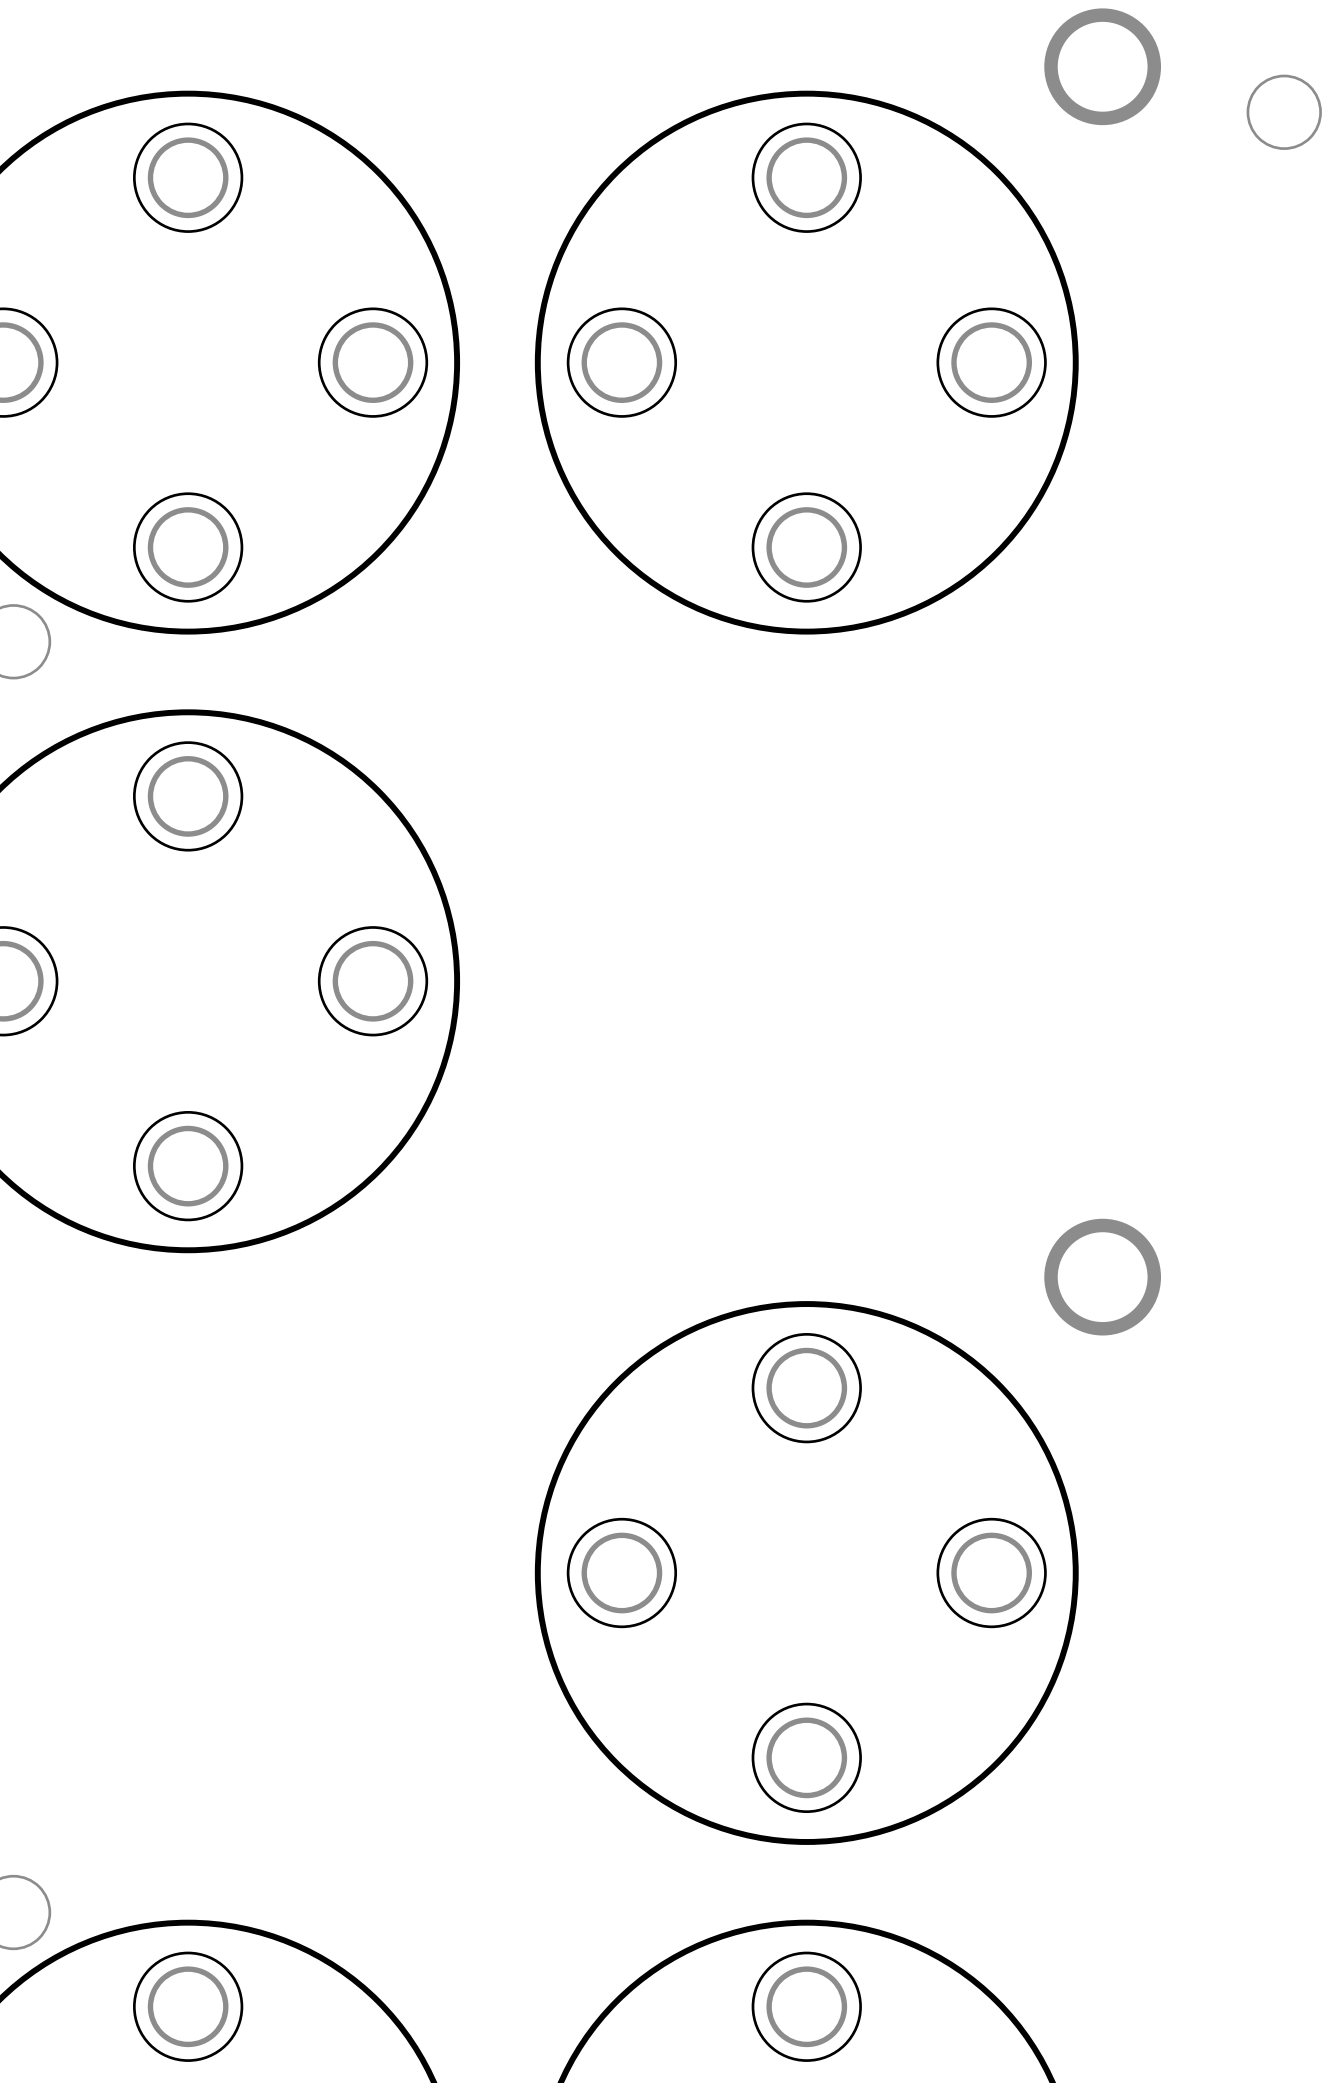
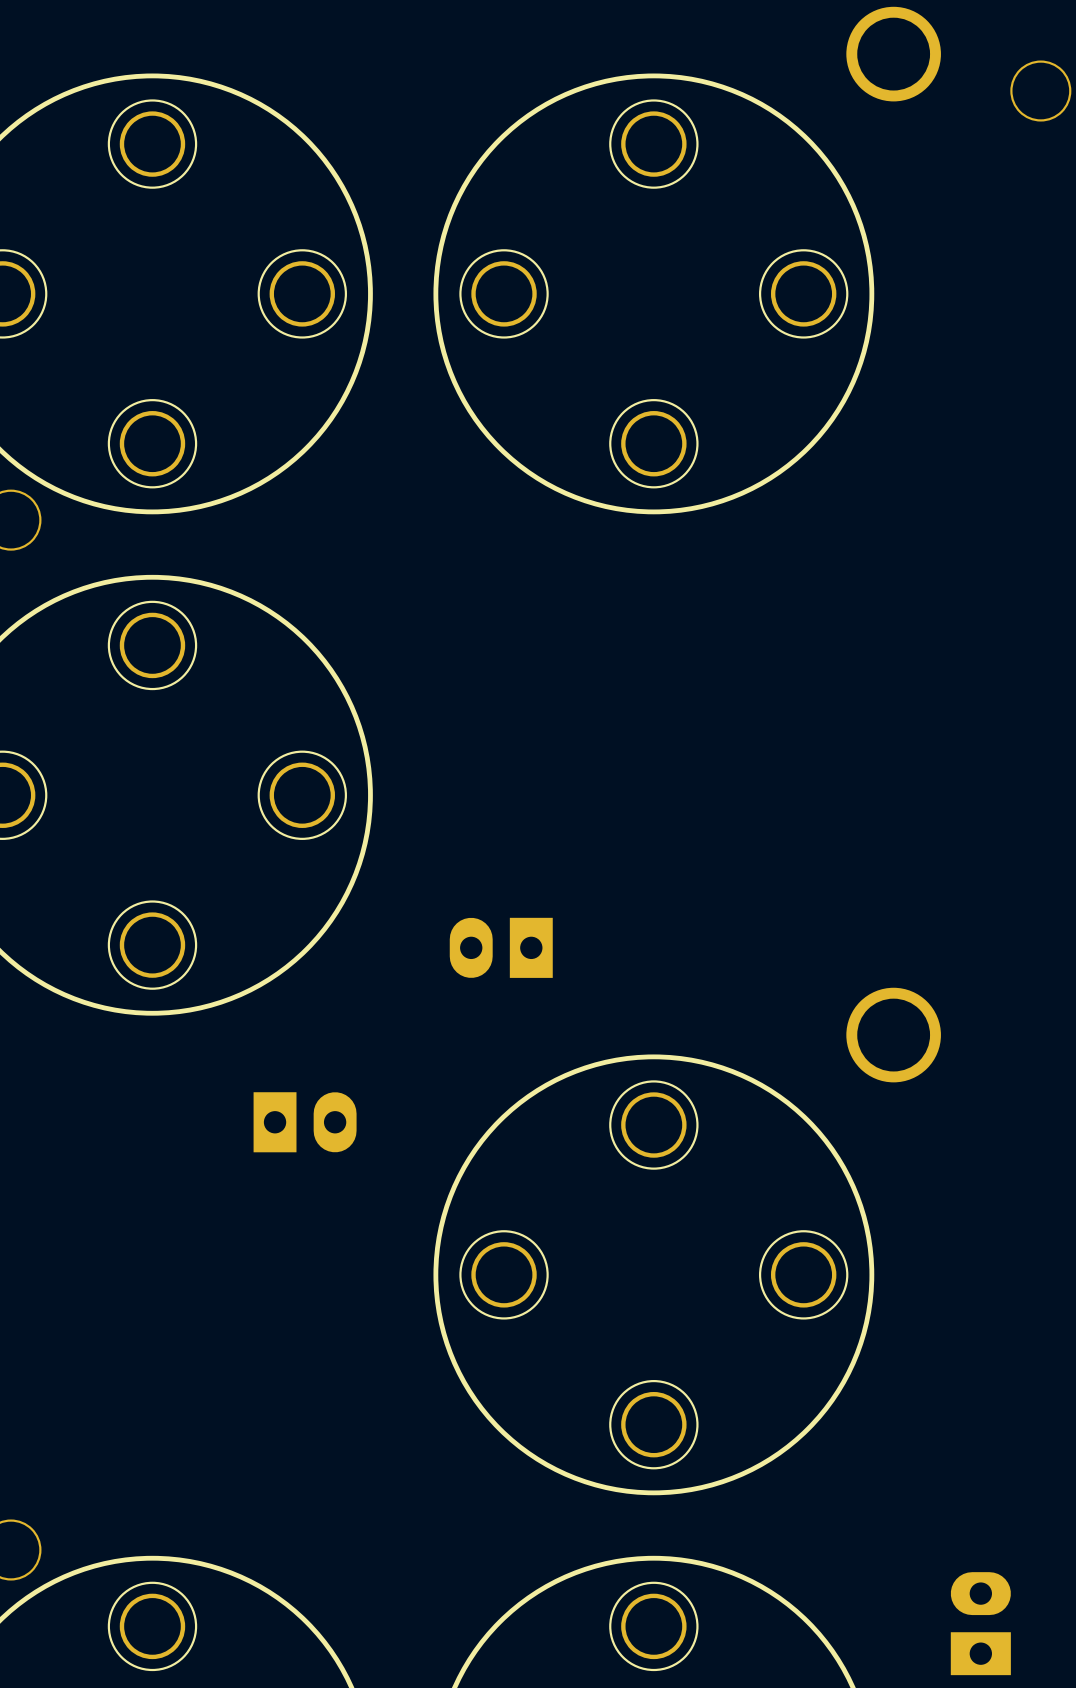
part: none -> (501, 947)
part: none -> (305, 1122)
part: none -> (980, 1623)

